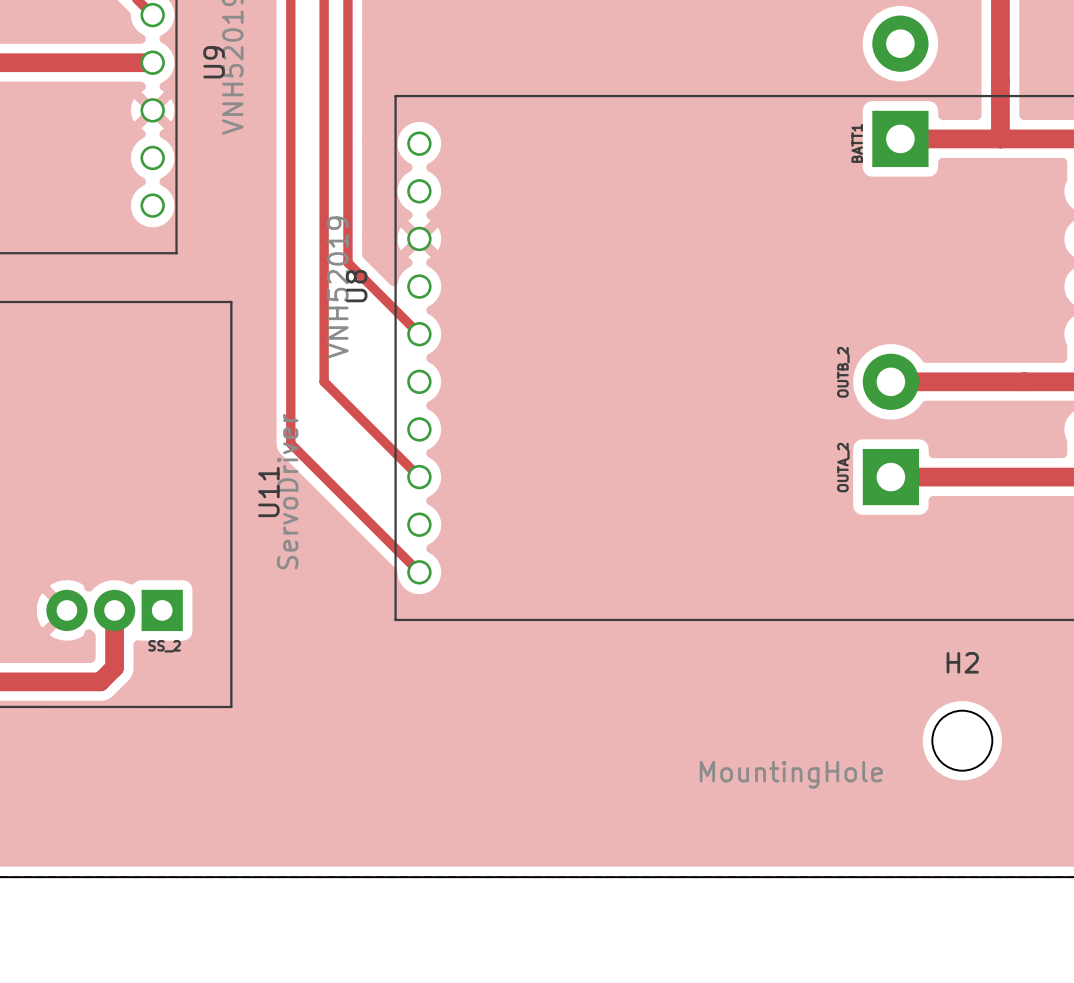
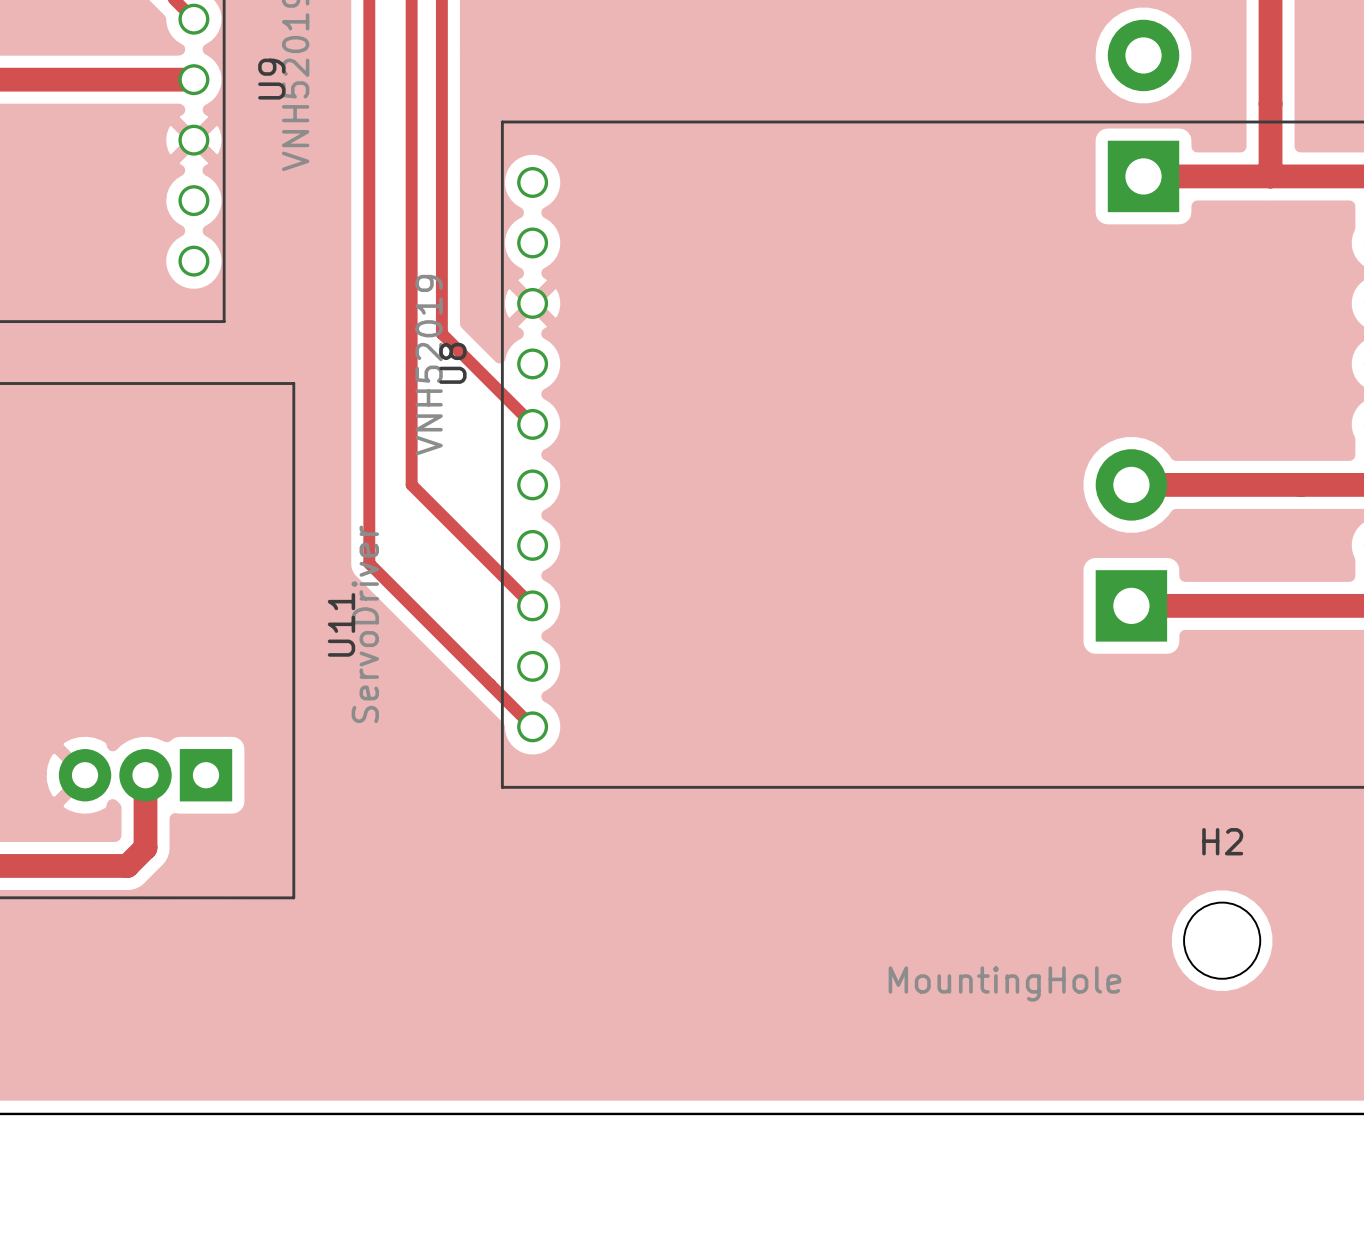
text: BATT1 (857, 143) -> none
text: OUTB_2 (843, 372) -> none
text: OUTA_2 (843, 467) -> none
text: SS_2 (164, 646) -> none

